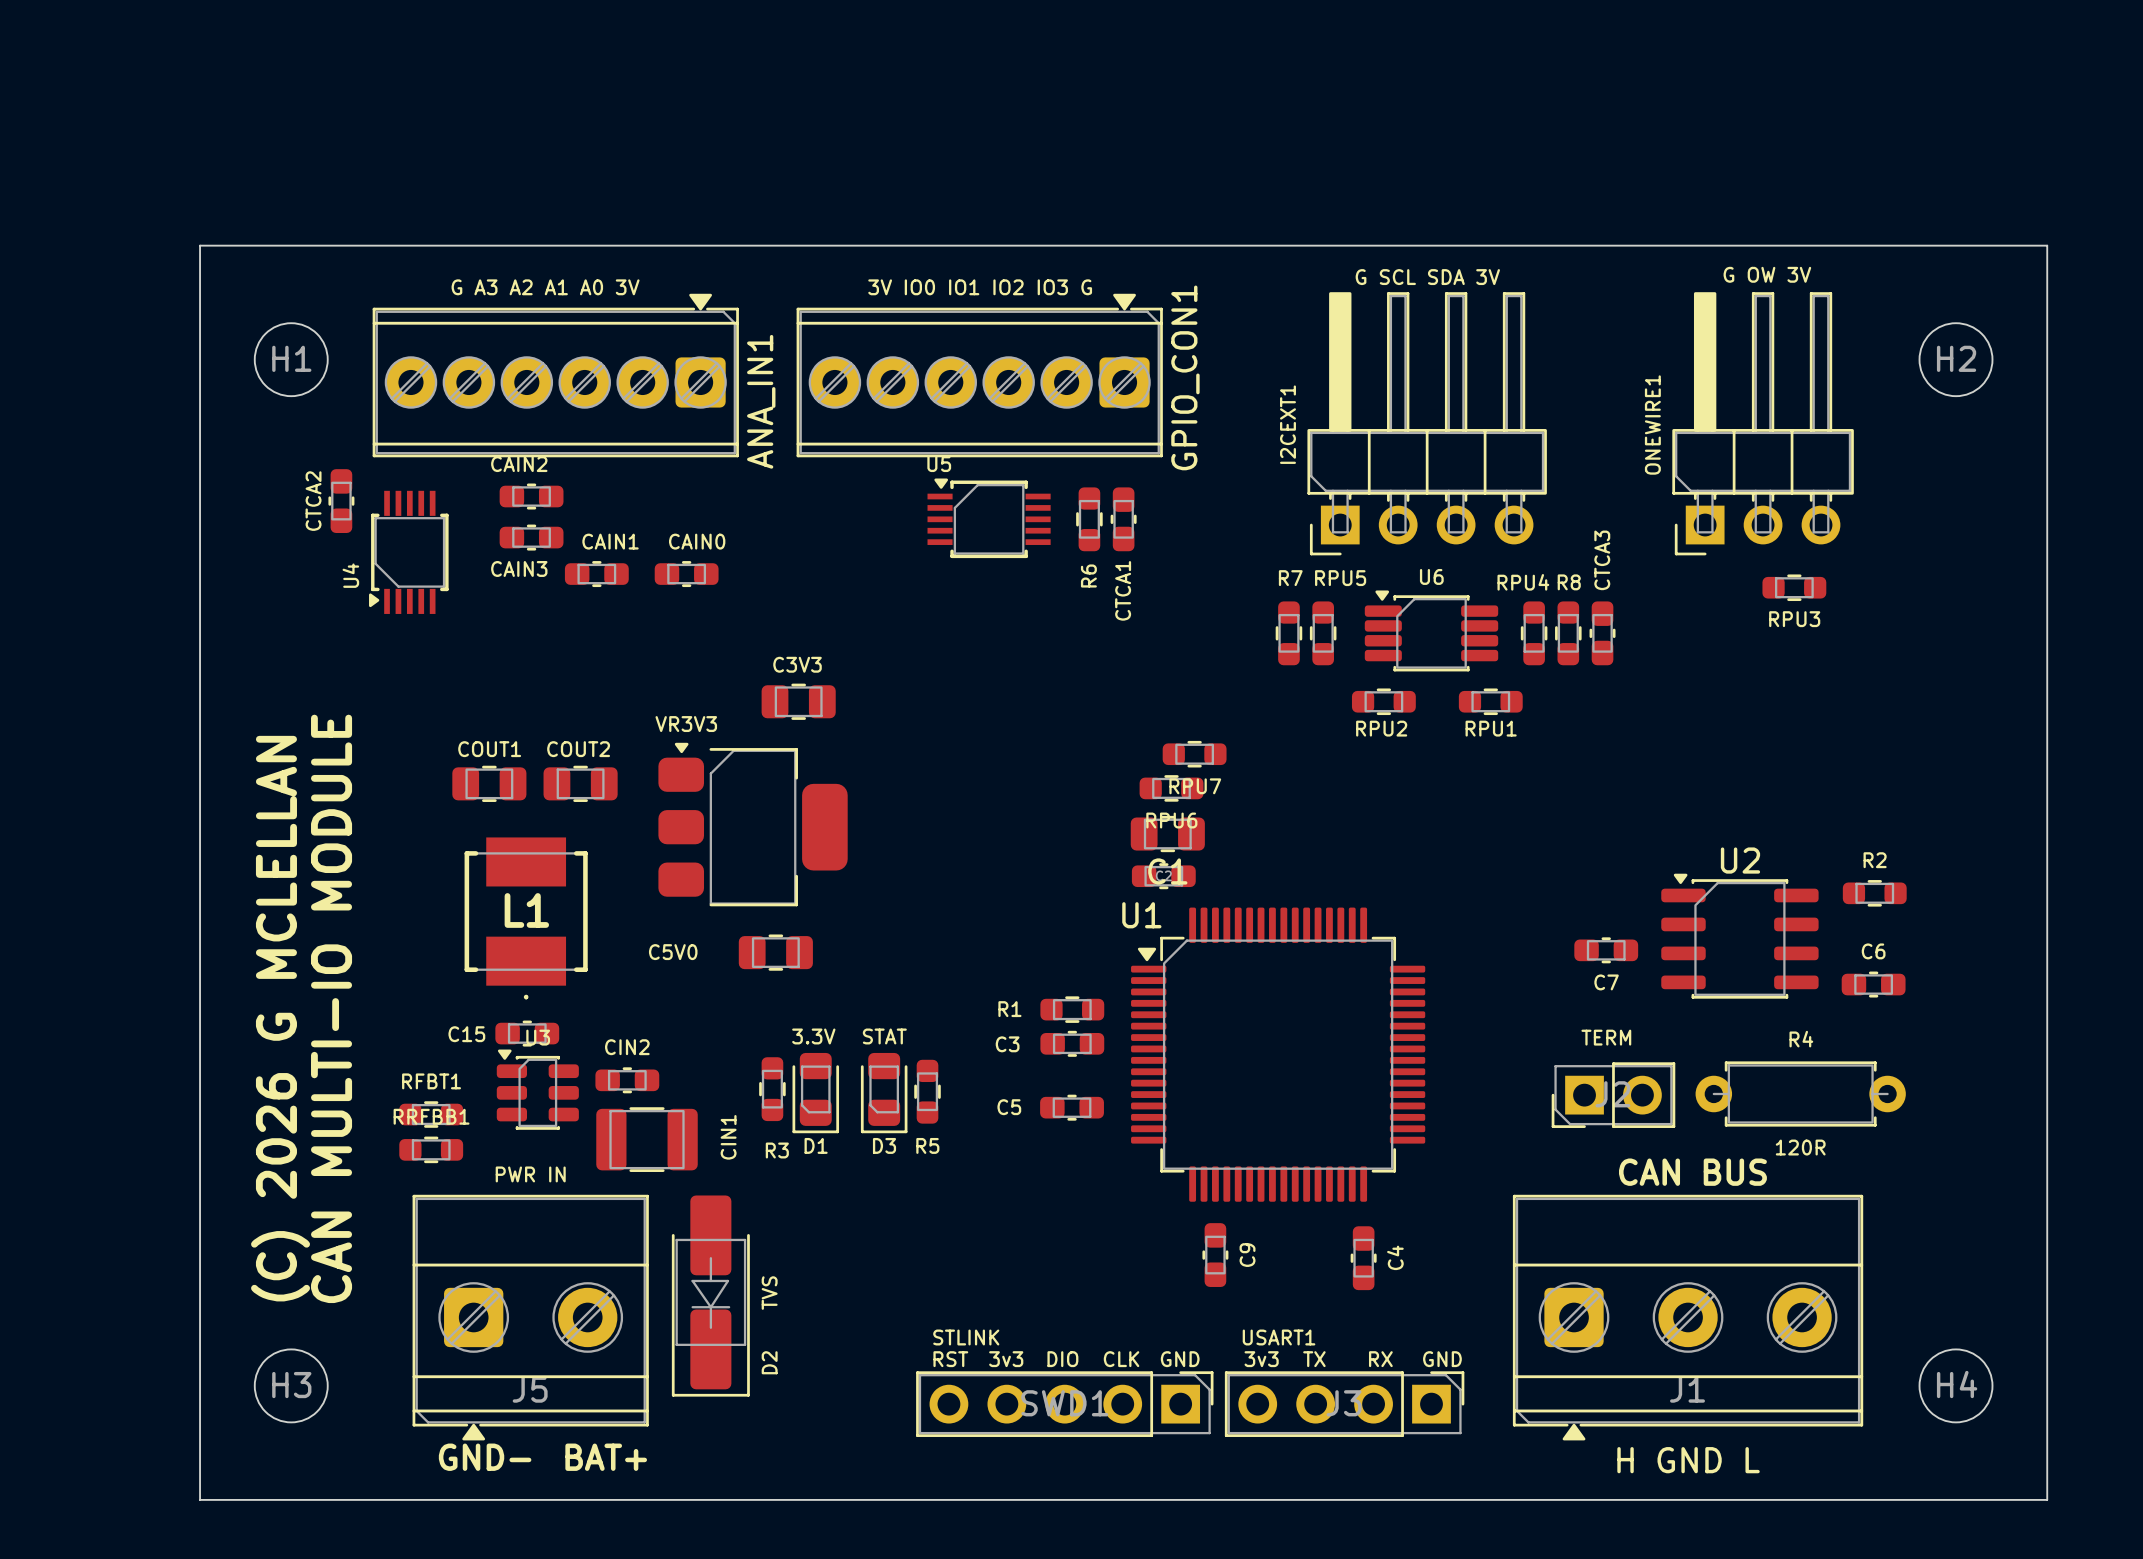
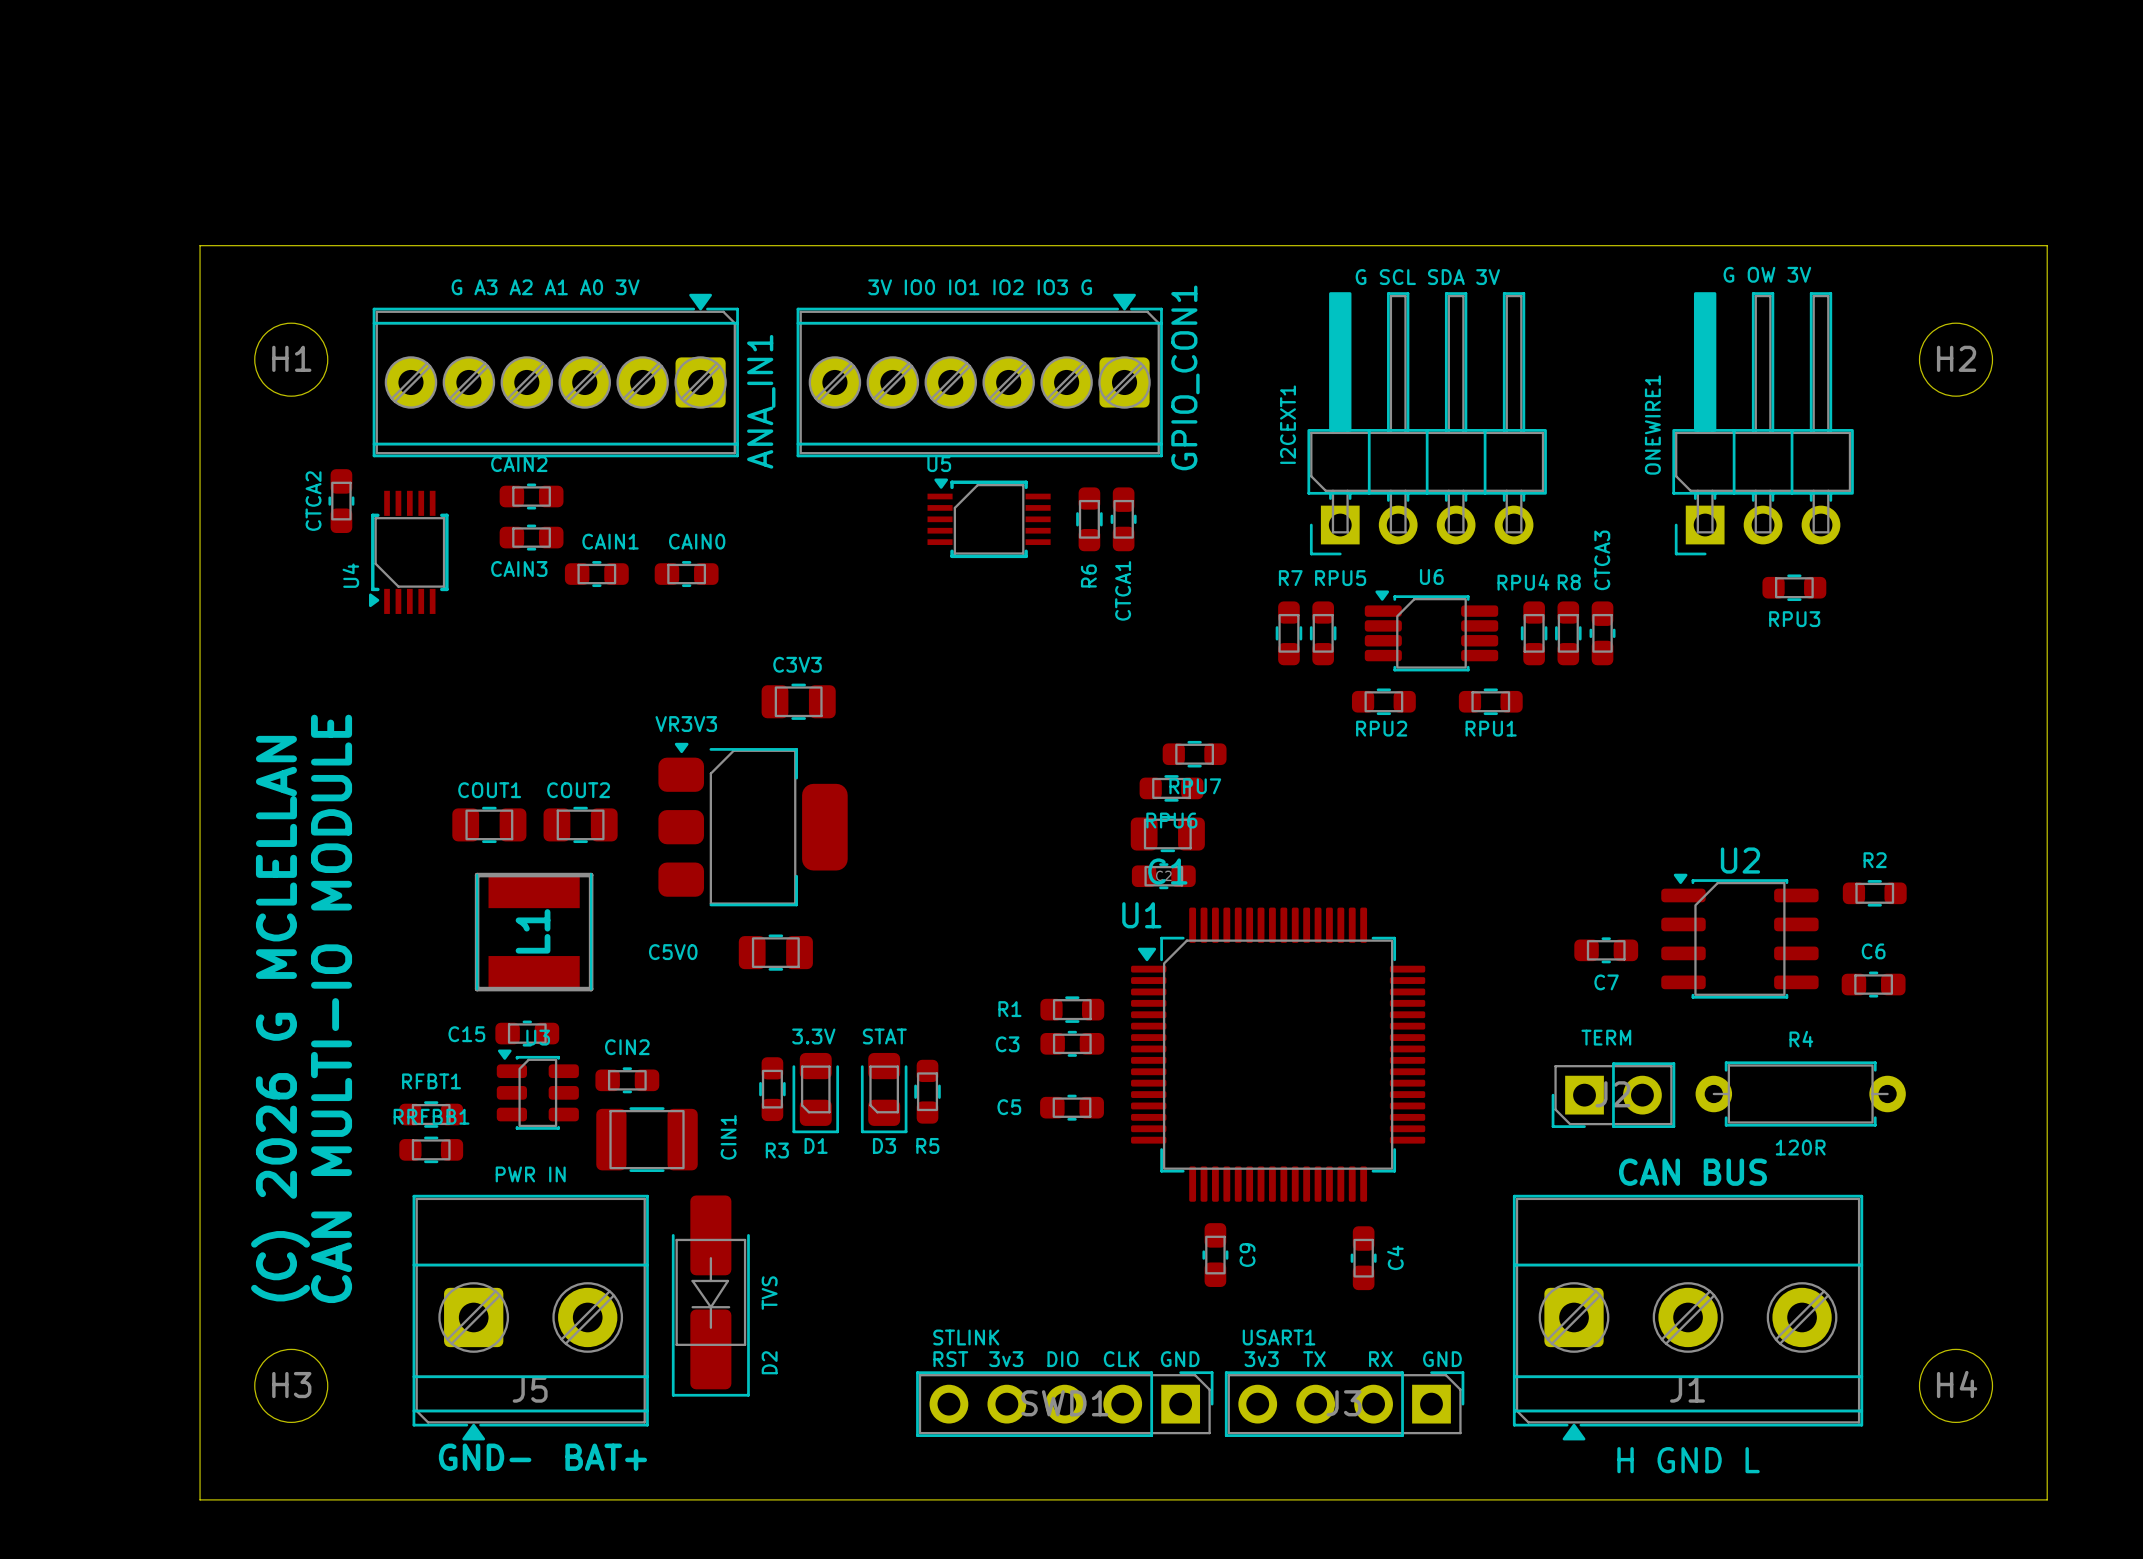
COUT1 position: (489, 783) -> (489, 824)
COUT2 position: (580, 783) -> (580, 824)
L1 footprint: [464, 837, 588, 1000] -> [474, 872, 594, 992]

